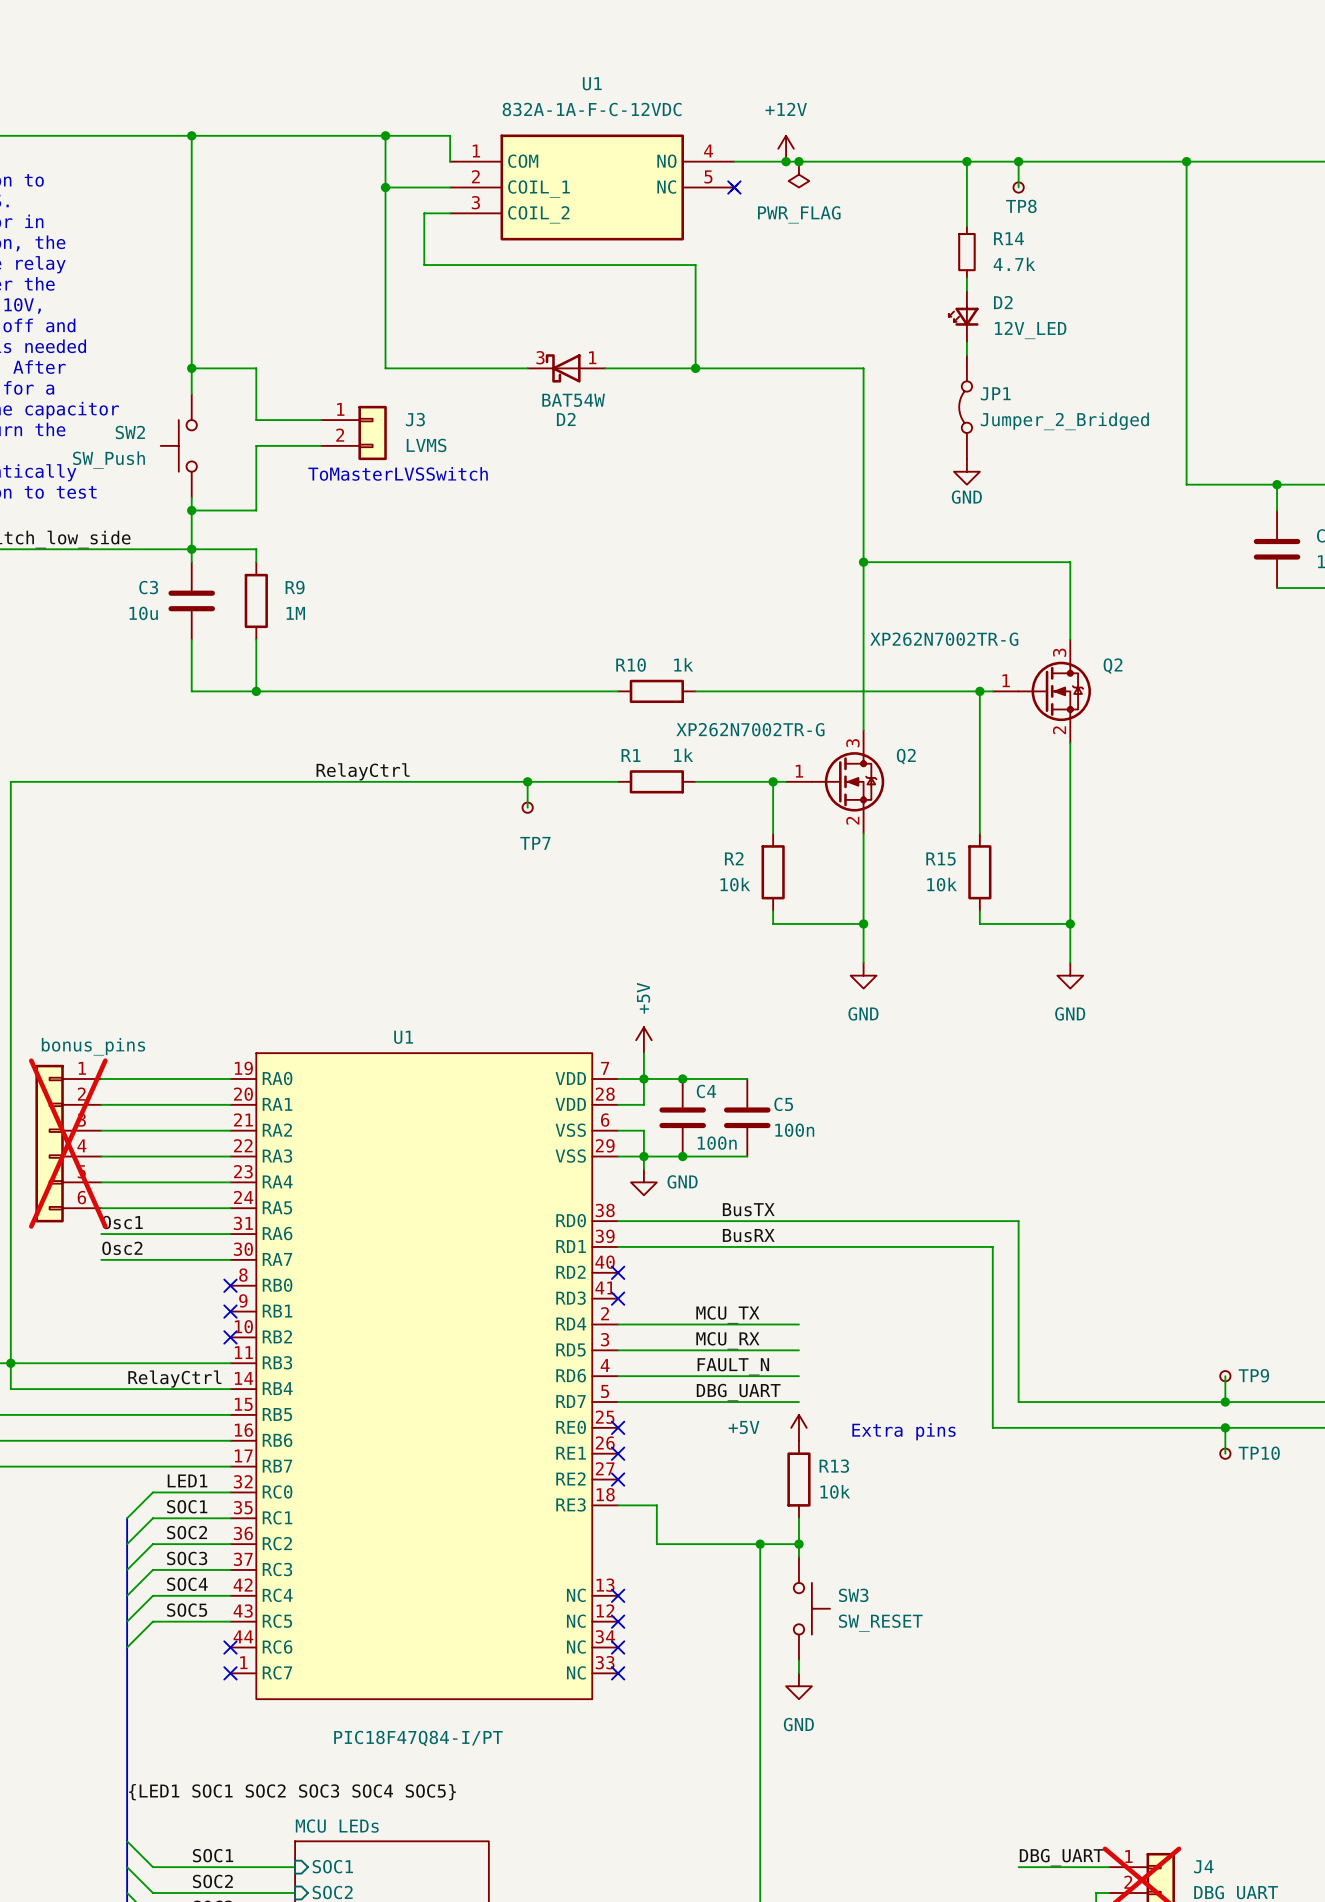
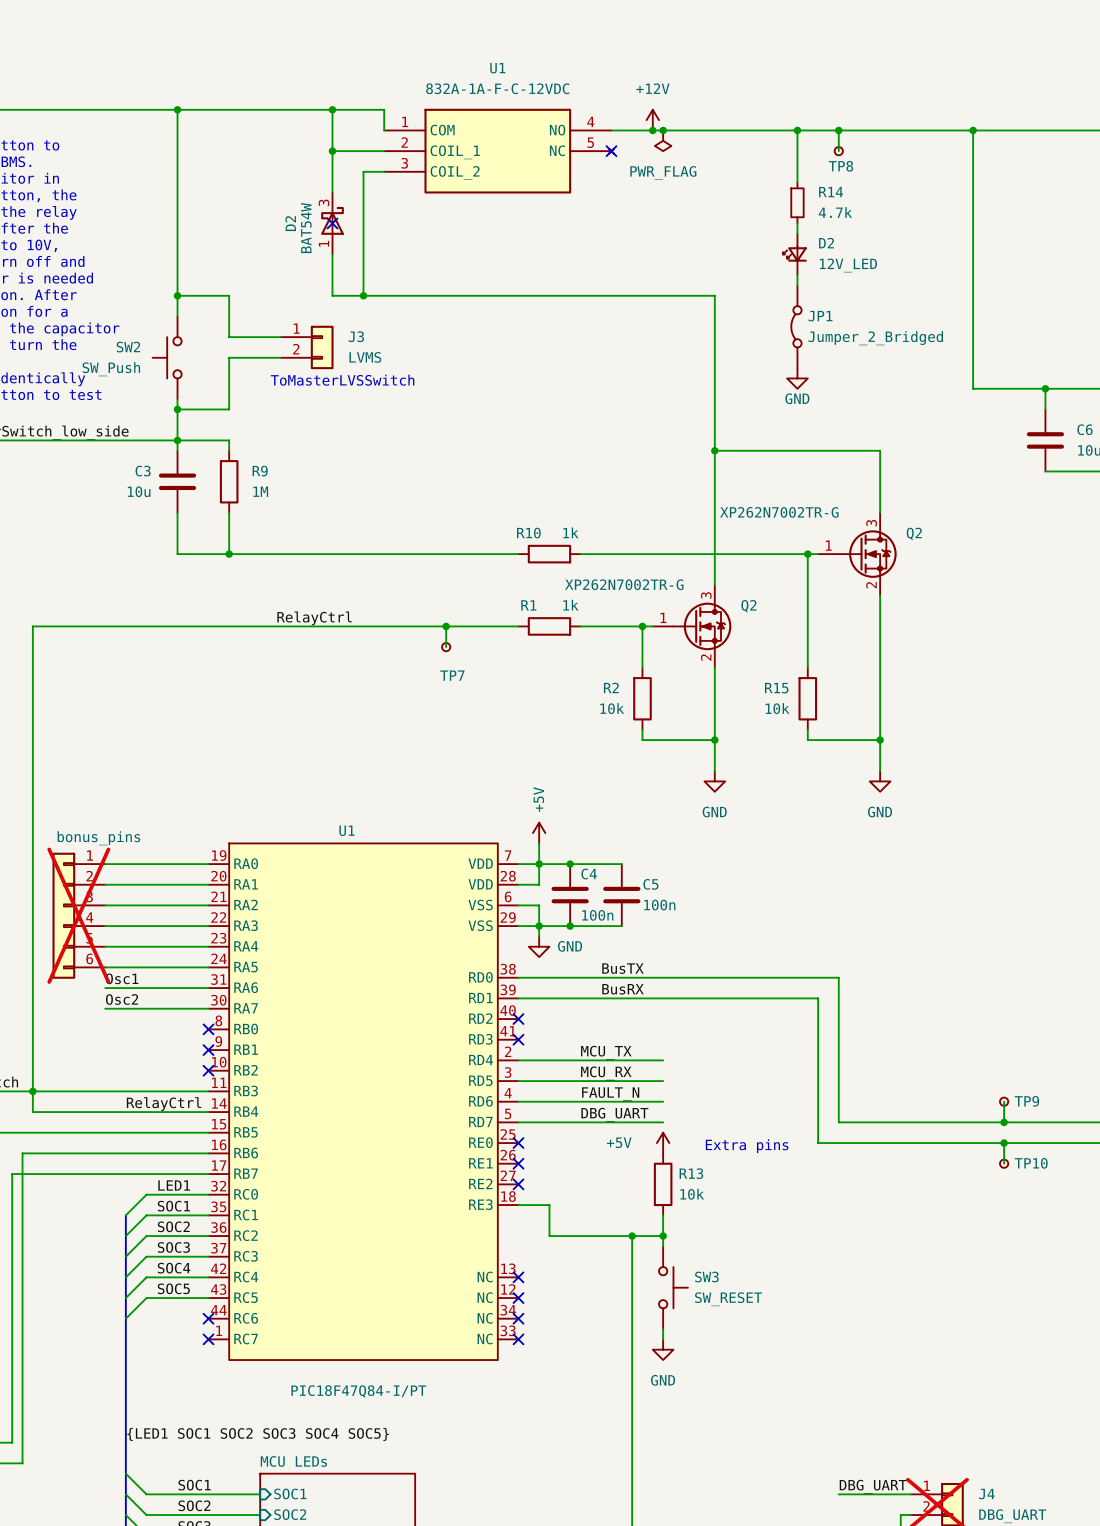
wire: (424, 265) (695, 265) (695, 368) -> (363, 213) (363, 295)
no-connect mark: none -> (332, 223)
junction: none -> (363, 295)
D2 rotation: 0° (563, 368) -> 90° clockwise (332, 220)
D2 position: (566, 368) -> (332, 223)
junction: (695, 368) -> none

